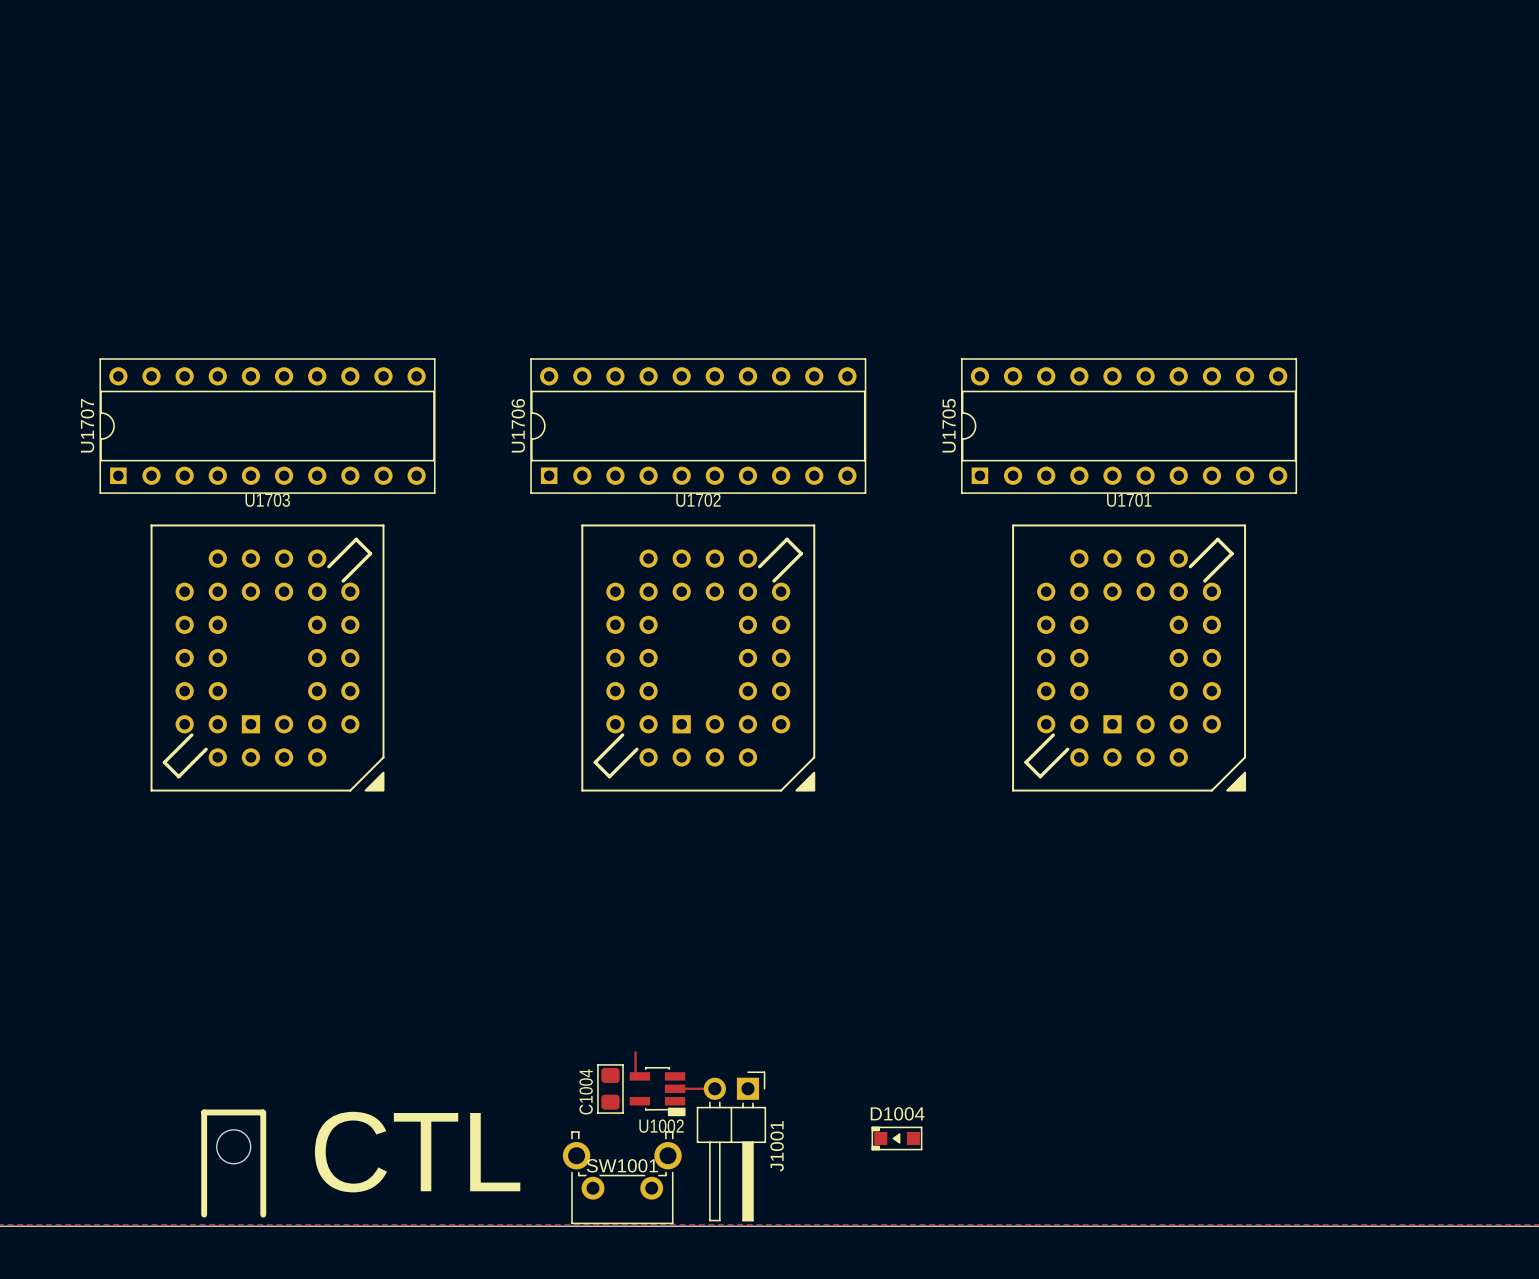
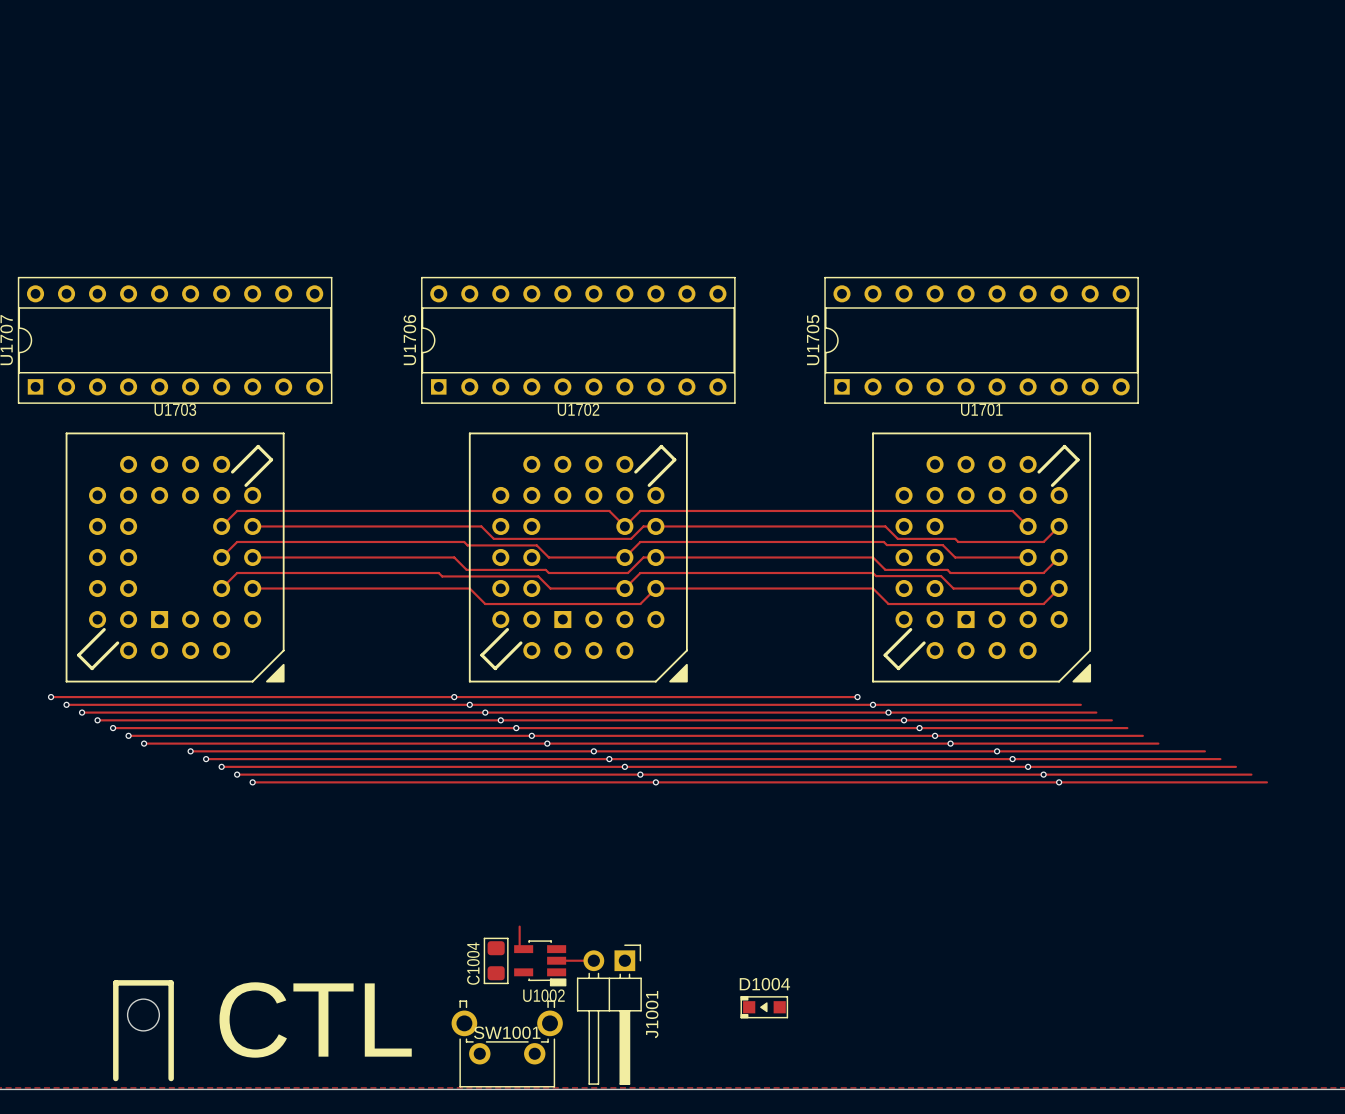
track: none -> (221, 526) (237, 510) (609, 510) (624, 526) (640, 510) (1012, 510) (1028, 526)
track: none -> (252, 526) (481, 526) (493, 538) (631, 538) (643, 526) (885, 526) (897, 538) (955, 538) (958, 541) (1043, 541) (1059, 526)
track: none -> (221, 557) (237, 541) (464, 541) (467, 545) (536, 545) (548, 557) (624, 557) (640, 541) (883, 541) (886, 545) (942, 545) (955, 557) (1028, 557)
track: none -> (252, 557) (454, 557) (466, 569) (545, 569) (548, 573) (627, 573) (643, 557) (873, 557) (885, 569) (947, 569) (950, 573) (1043, 573) (1059, 557)
track: none -> (221, 588) (237, 573) (438, 573) (442, 576) (538, 576) (550, 588) (624, 588) (640, 573) (873, 573) (876, 576) (941, 576) (953, 588) (1028, 588)
track: none -> (252, 588) (469, 588) (485, 604) (640, 604) (655, 588) (873, 588) (888, 604) (1043, 604) (1059, 588)
track: none -> (51, 697) (857, 697)
via: none -> (51, 697)
via: none -> (454, 697)
via: none -> (857, 697)
track: none -> (66, 704) (1080, 704)
via: none -> (66, 704)
via: none -> (469, 704)
via: none -> (873, 704)
track: none -> (82, 712) (1096, 712)
via: none -> (82, 712)
via: none -> (485, 712)
via: none -> (888, 712)
track: none -> (97, 720) (1111, 720)
via: none -> (97, 720)
via: none -> (500, 720)
via: none -> (904, 720)
track: none -> (113, 728) (1127, 728)
via: none -> (113, 728)
via: none -> (516, 728)
via: none -> (919, 728)
track: none -> (128, 735) (1142, 735)
via: none -> (128, 735)
via: none -> (531, 735)
via: none -> (935, 735)
track: none -> (144, 743) (1158, 743)
via: none -> (144, 743)
via: none -> (547, 743)
via: none -> (950, 743)
track: none -> (190, 751) (1204, 751)
via: none -> (190, 751)
via: none -> (593, 751)
via: none -> (997, 751)
track: none -> (206, 759) (1220, 759)
via: none -> (206, 759)
via: none -> (609, 759)
via: none -> (1012, 759)
track: none -> (221, 766) (1235, 766)
via: none -> (221, 766)
via: none -> (624, 766)
via: none -> (1028, 766)
track: none -> (237, 774) (1251, 774)
via: none -> (237, 774)
via: none -> (640, 774)
via: none -> (1043, 774)
track: none -> (252, 782) (1266, 782)
via: none -> (252, 782)
via: none -> (655, 782)
via: none -> (1059, 782)

